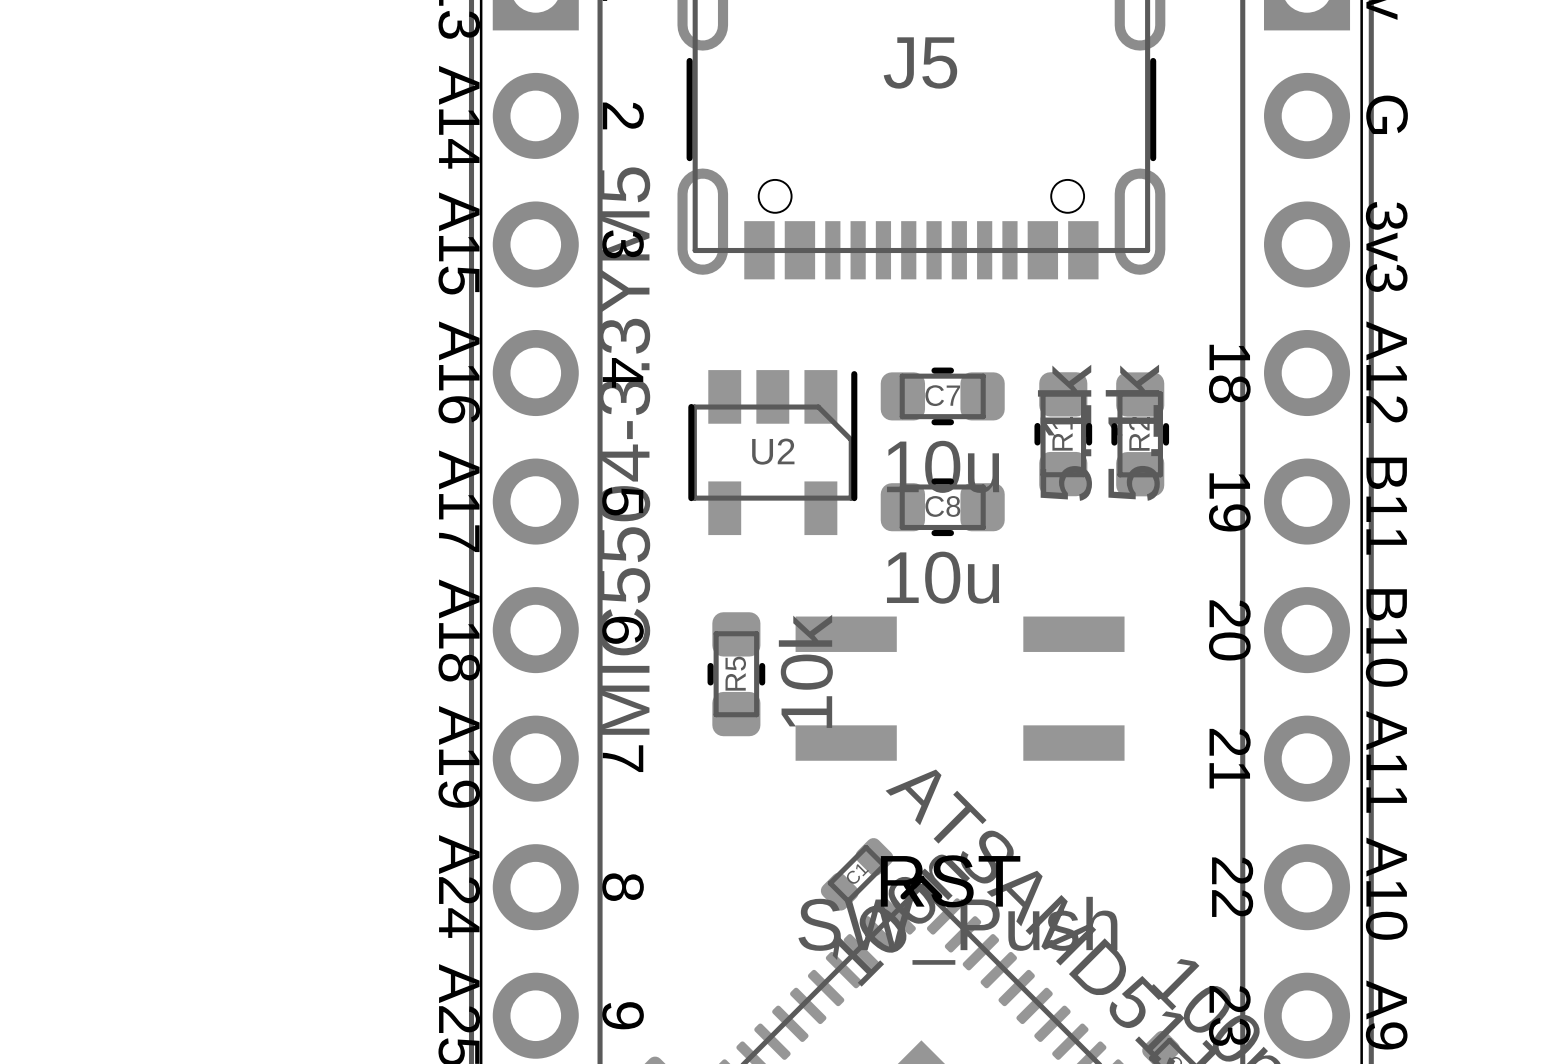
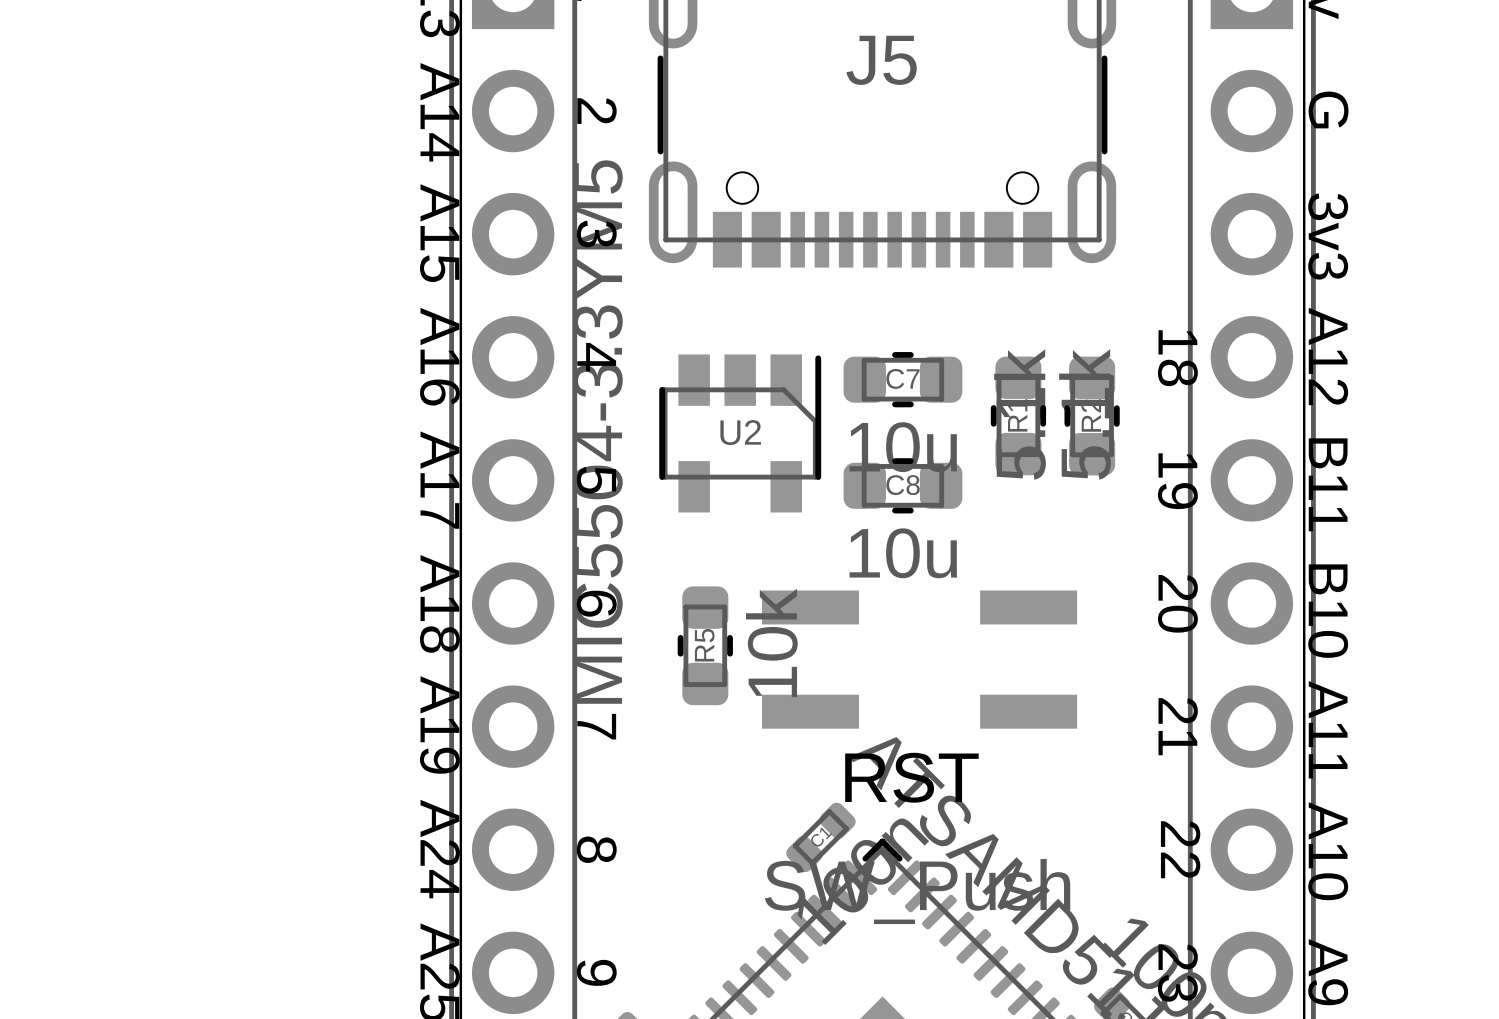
text position: RST (950, 881) -> RST (911, 777)

